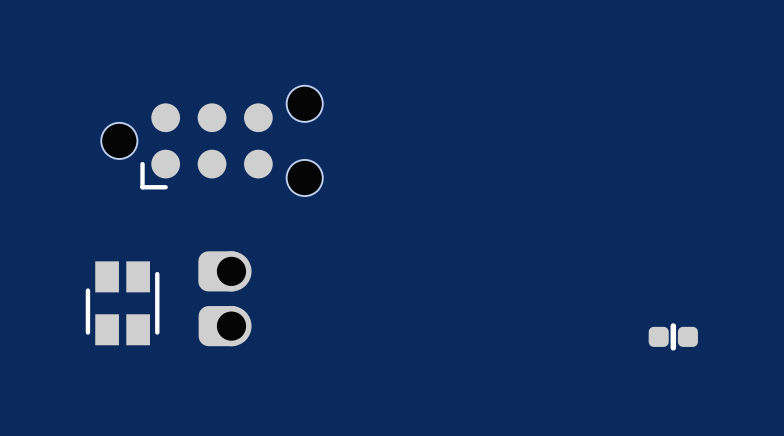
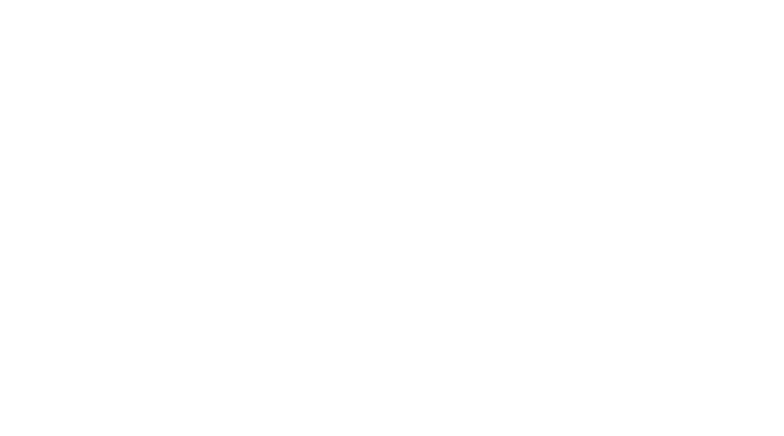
part: (212, 140) -> none
part: (224, 298) -> none
part: (122, 303) -> none
part: (673, 336) -> none

